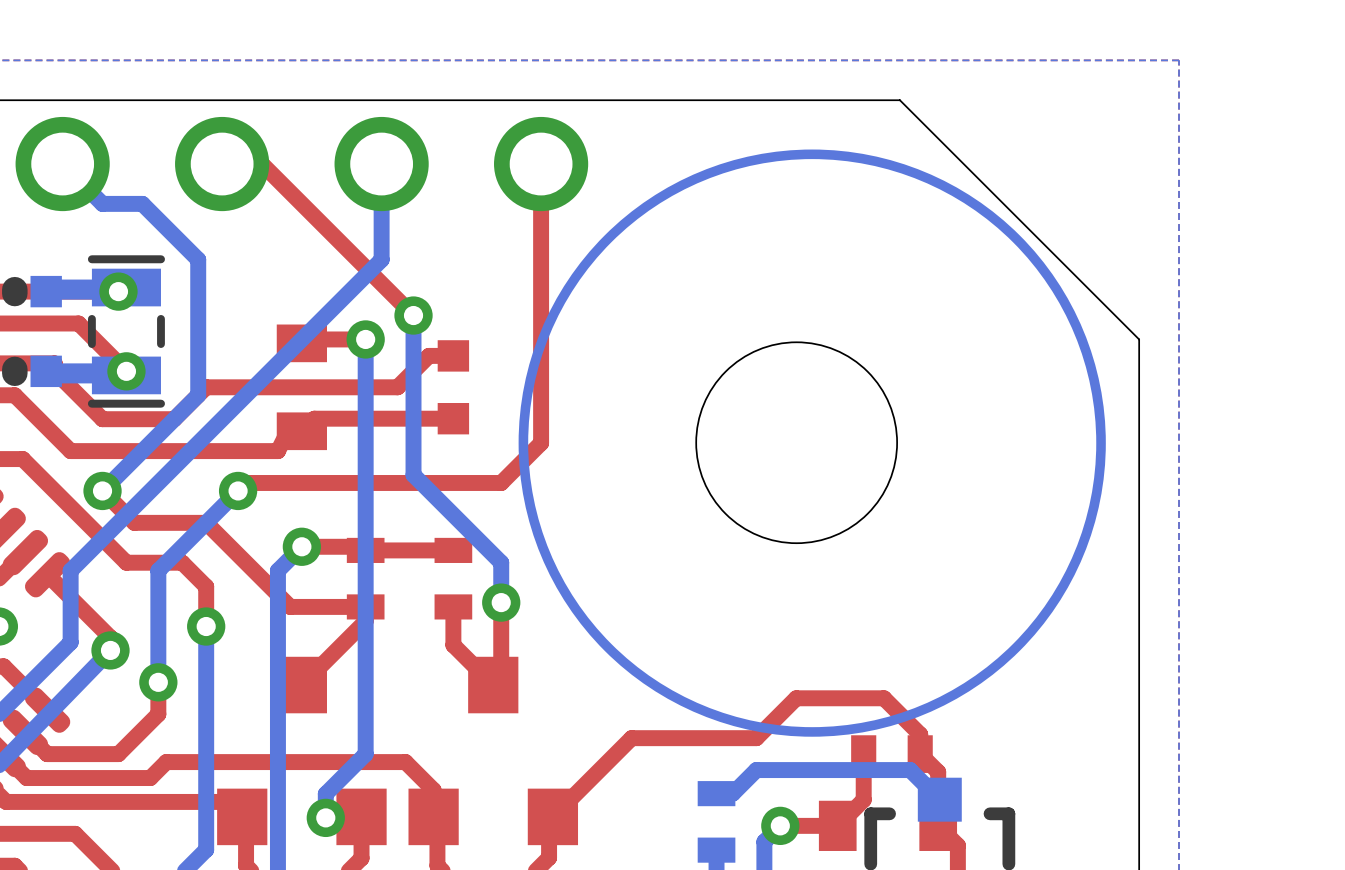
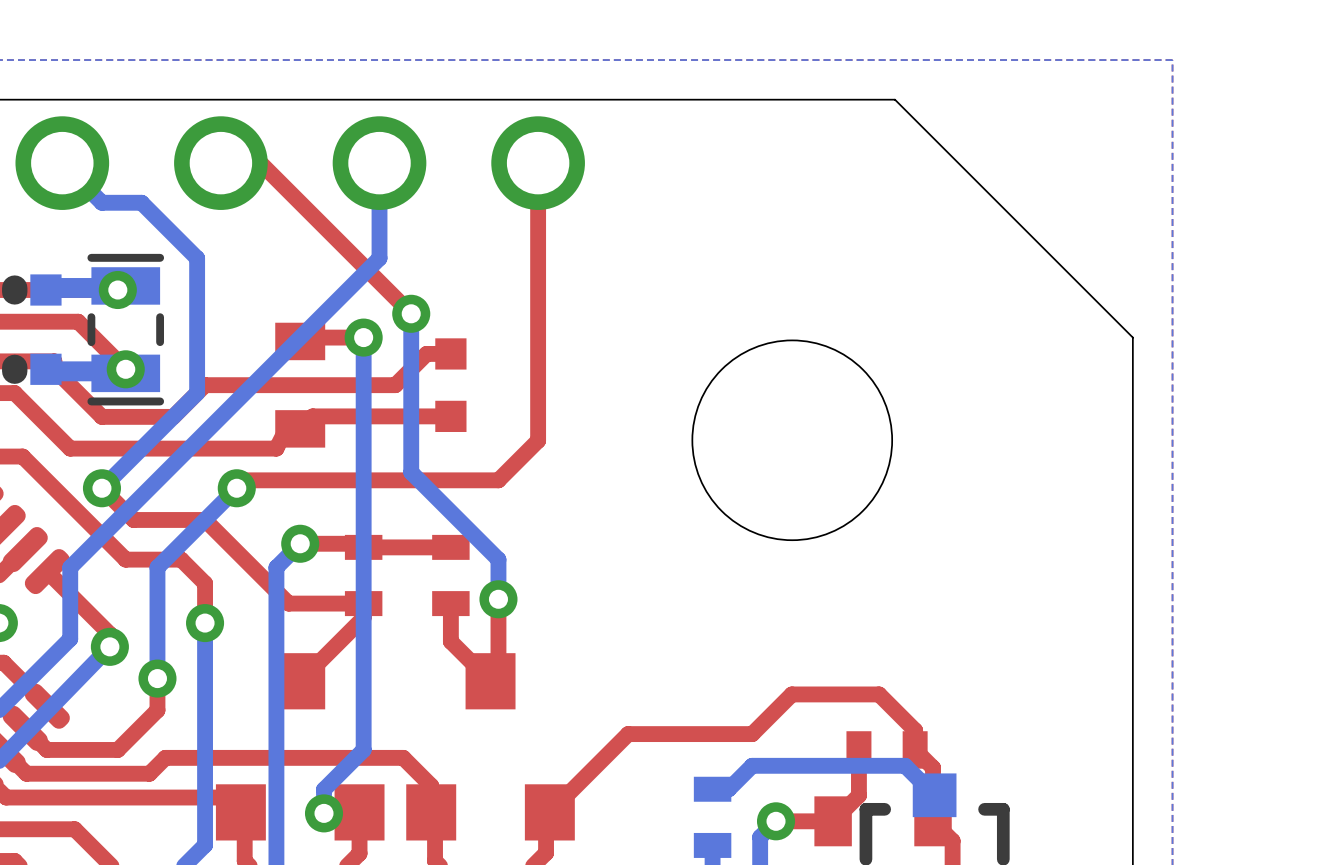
drawing: [518, 149, 1106, 737] -> none

